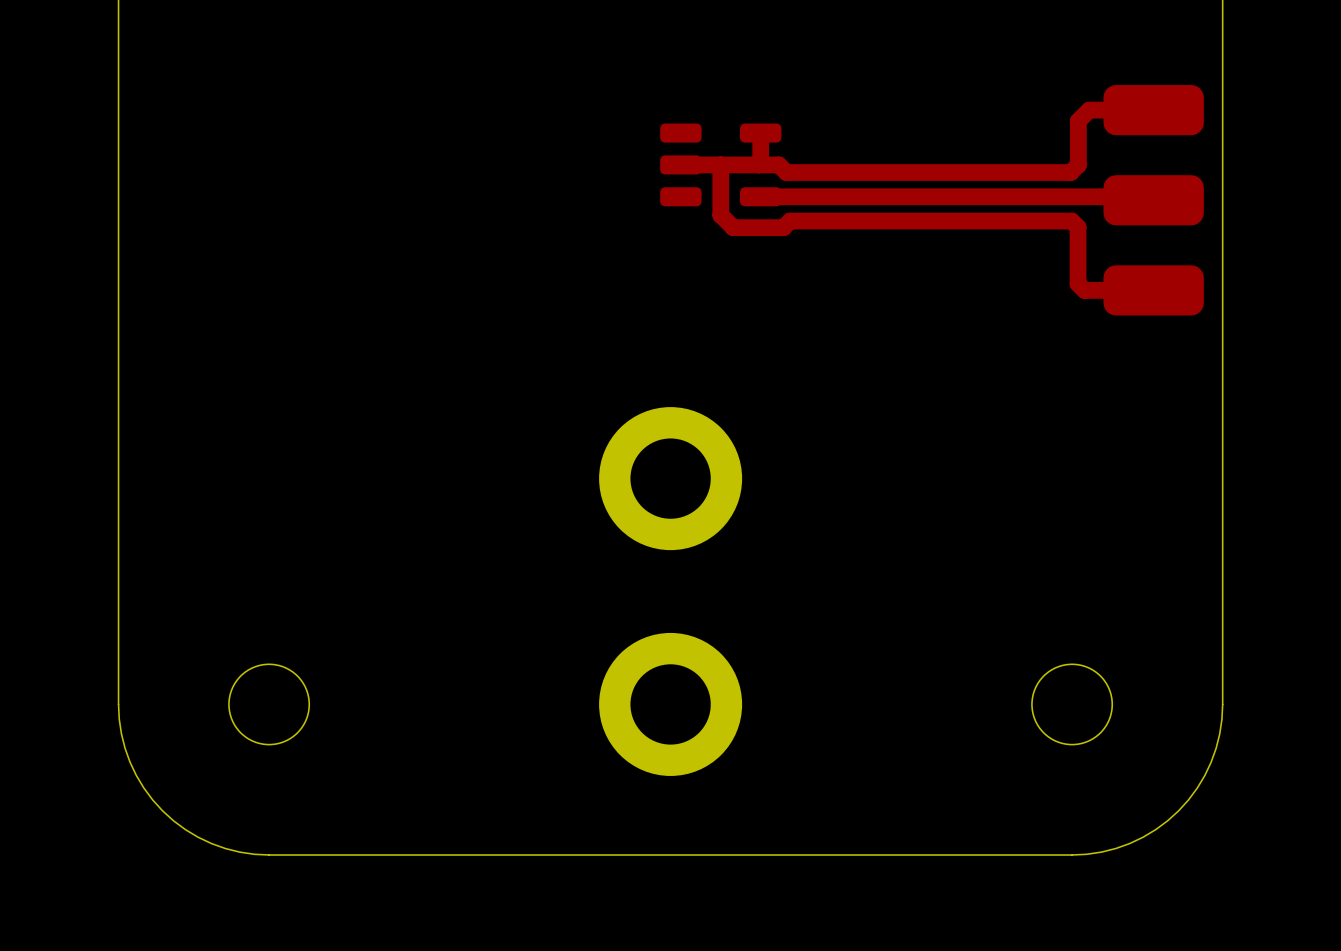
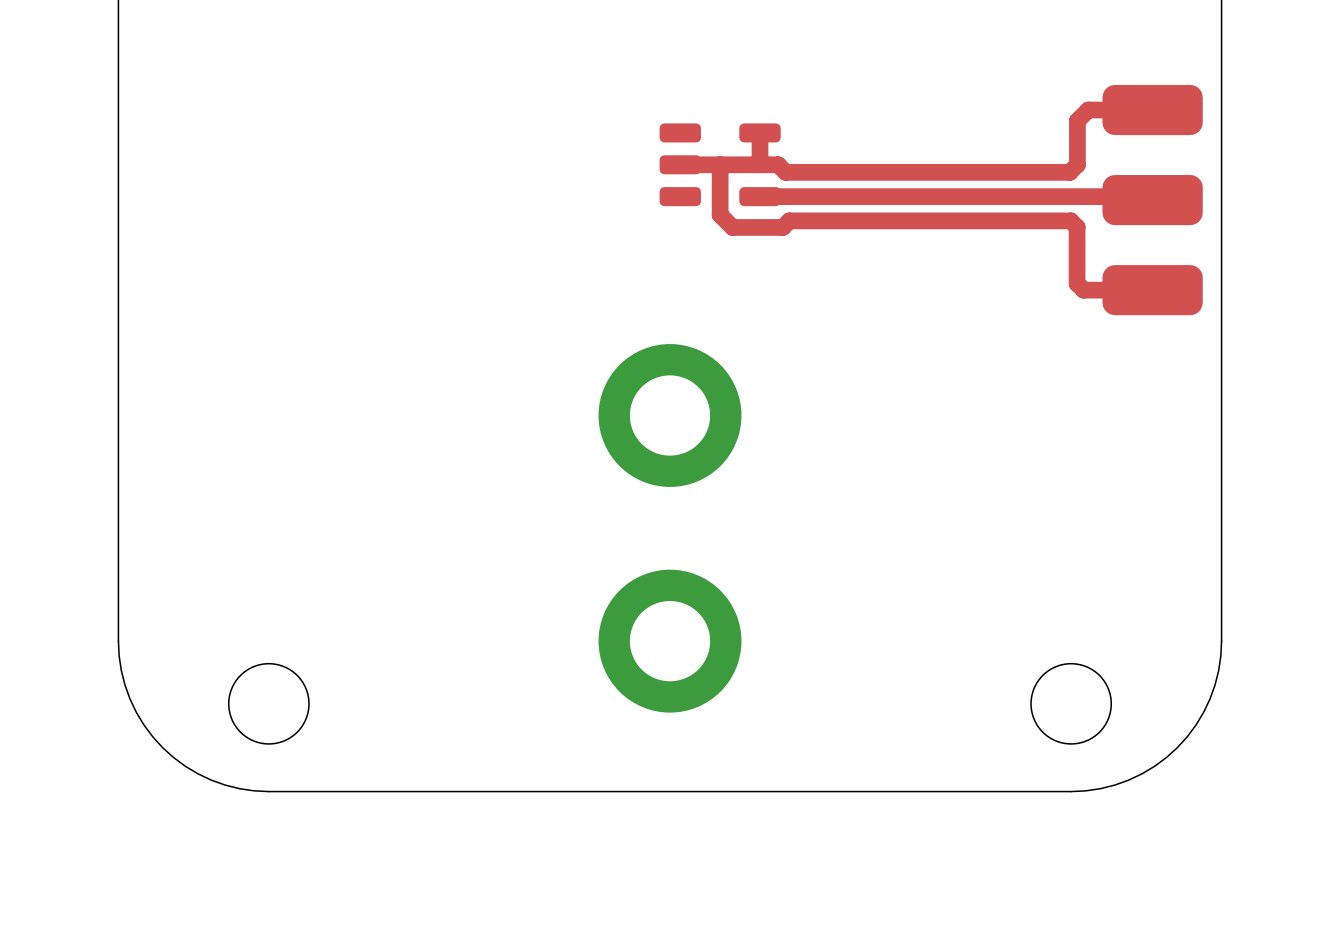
part position: (670, 478) -> (670, 415)
board edge: (1222, 641) (1222, 704) (1219, 733) (1211, 762) (1197, 788) (1178, 810) (1143, 837) (1101, 852) (1072, 855) (269, 855) (239, 852) (211, 843) (185, 829) (152, 799) (136, 775) (125, 748) (119, 719) (118, 641) -> (1221, 641) (1218, 670) (1210, 698) (1196, 724) (1177, 747) (1154, 766) (1128, 780) (1100, 788) (1071, 791) (268, 791) (239, 788) (197, 773) (173, 757) (152, 736) (129, 698) (121, 670) (118, 641)
part position: (670, 704) -> (670, 641)

